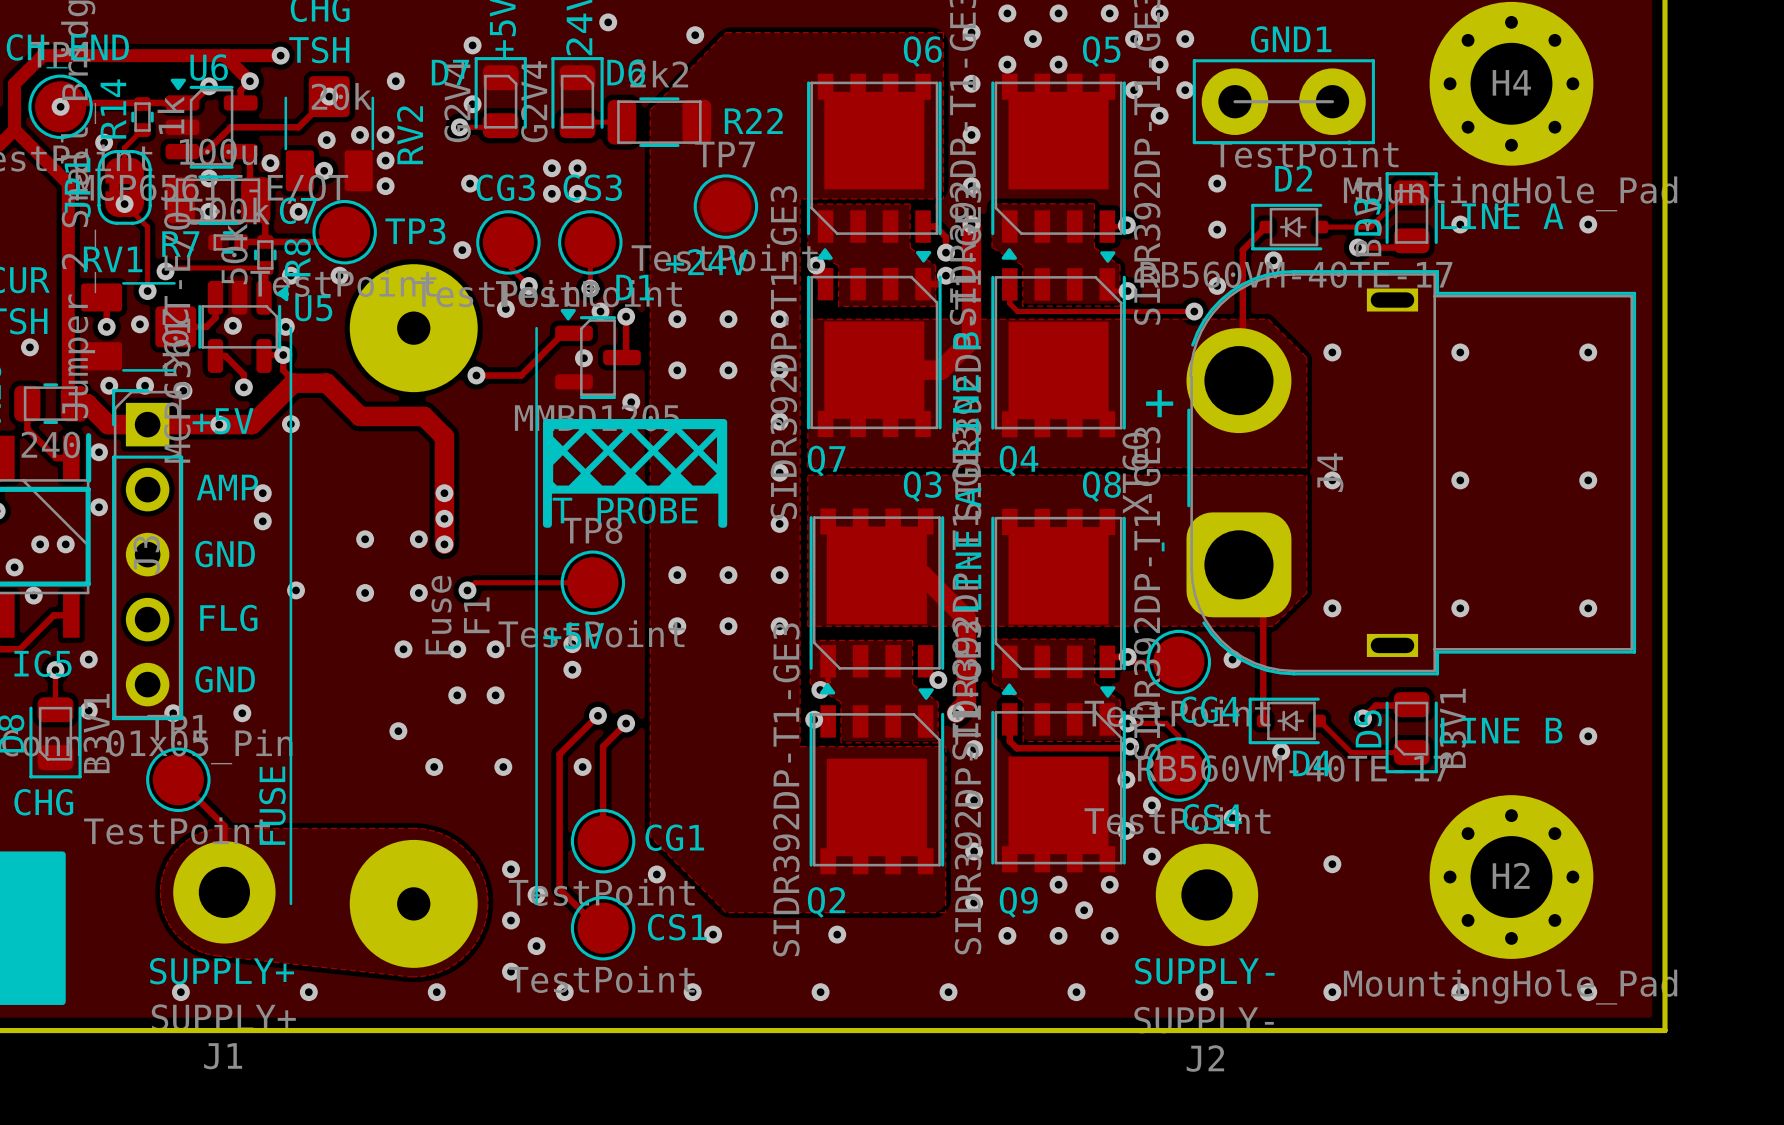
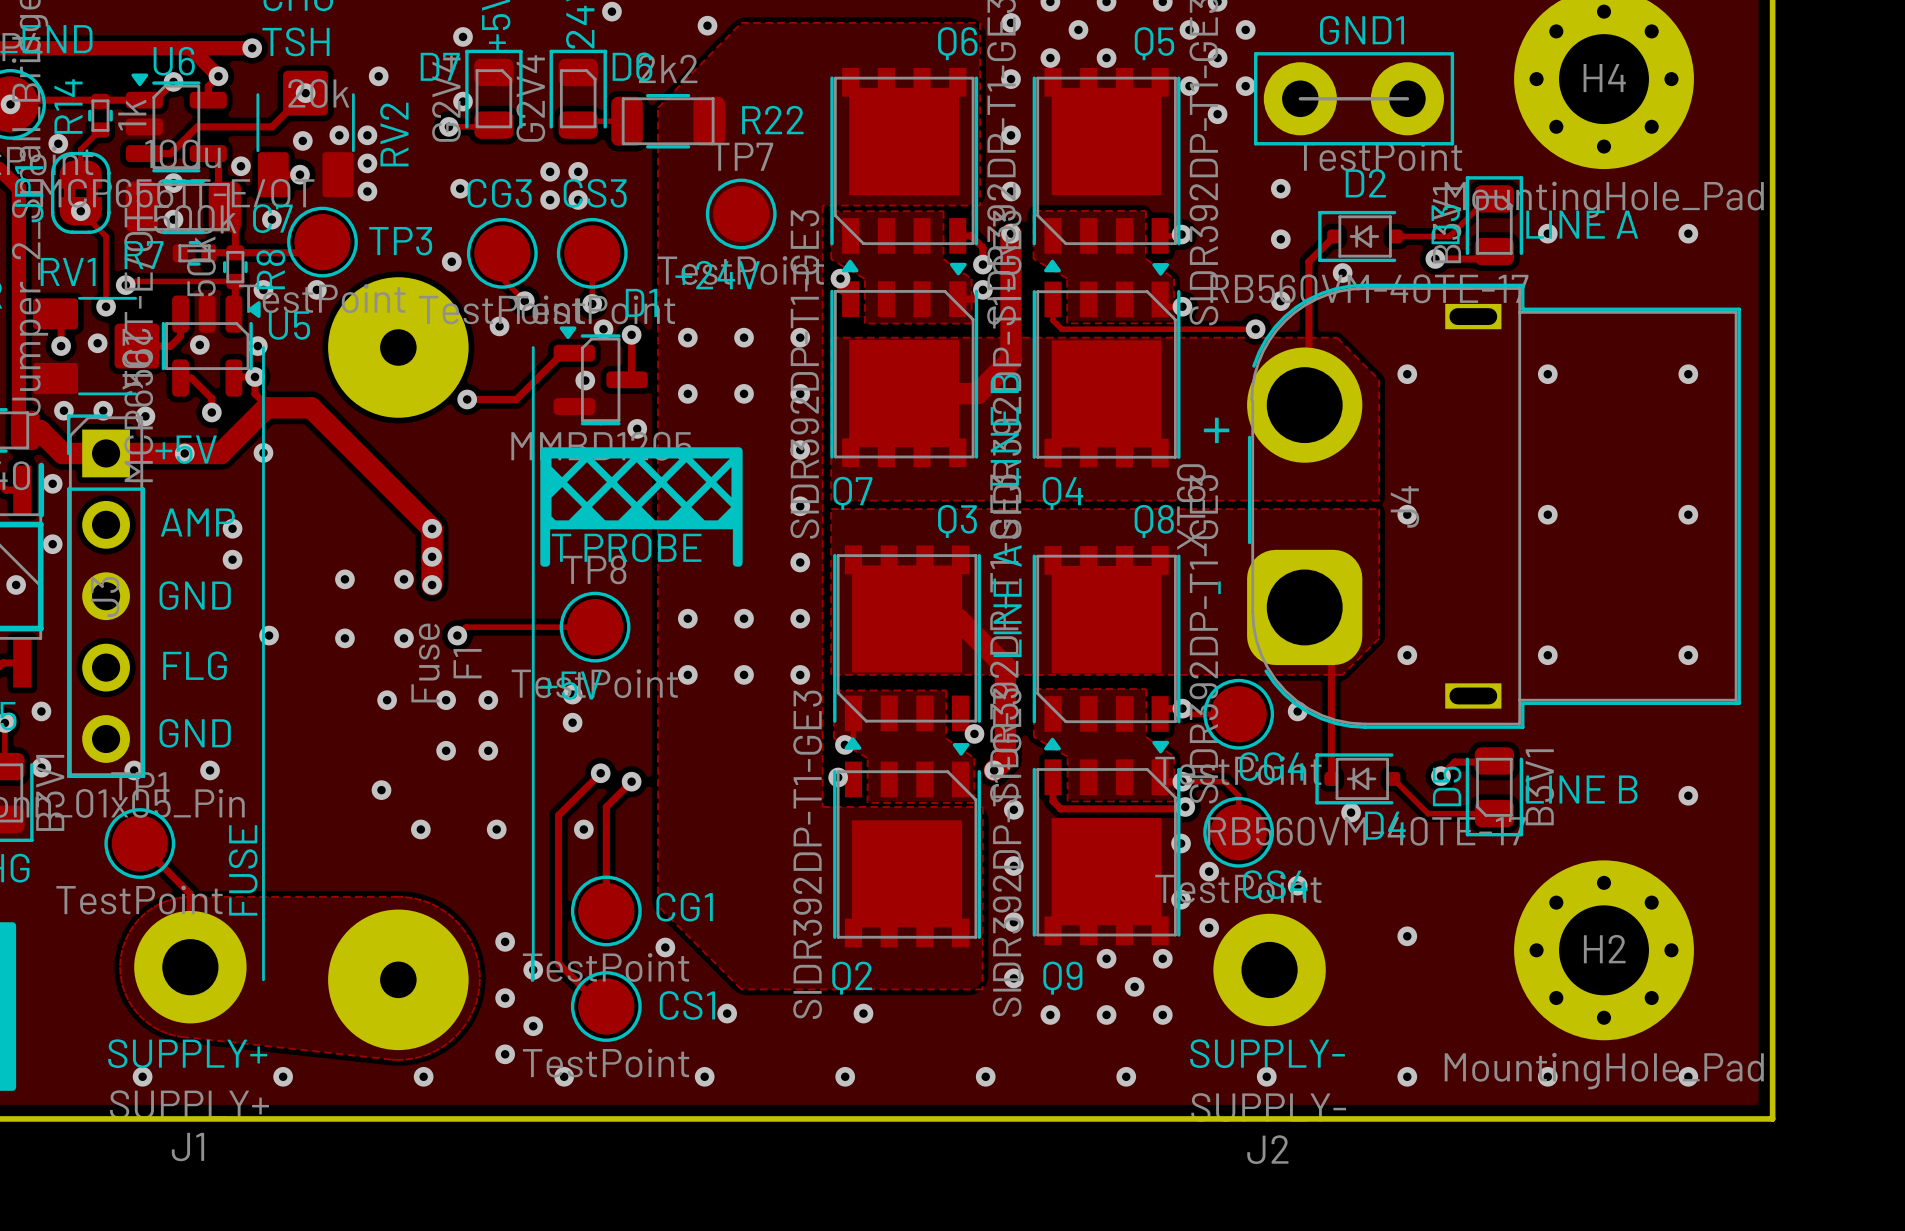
track: (326, 383) (360, 416) (423, 416) (444, 436) (444, 493) -> (302, 407) (311, 407) (432, 528)

